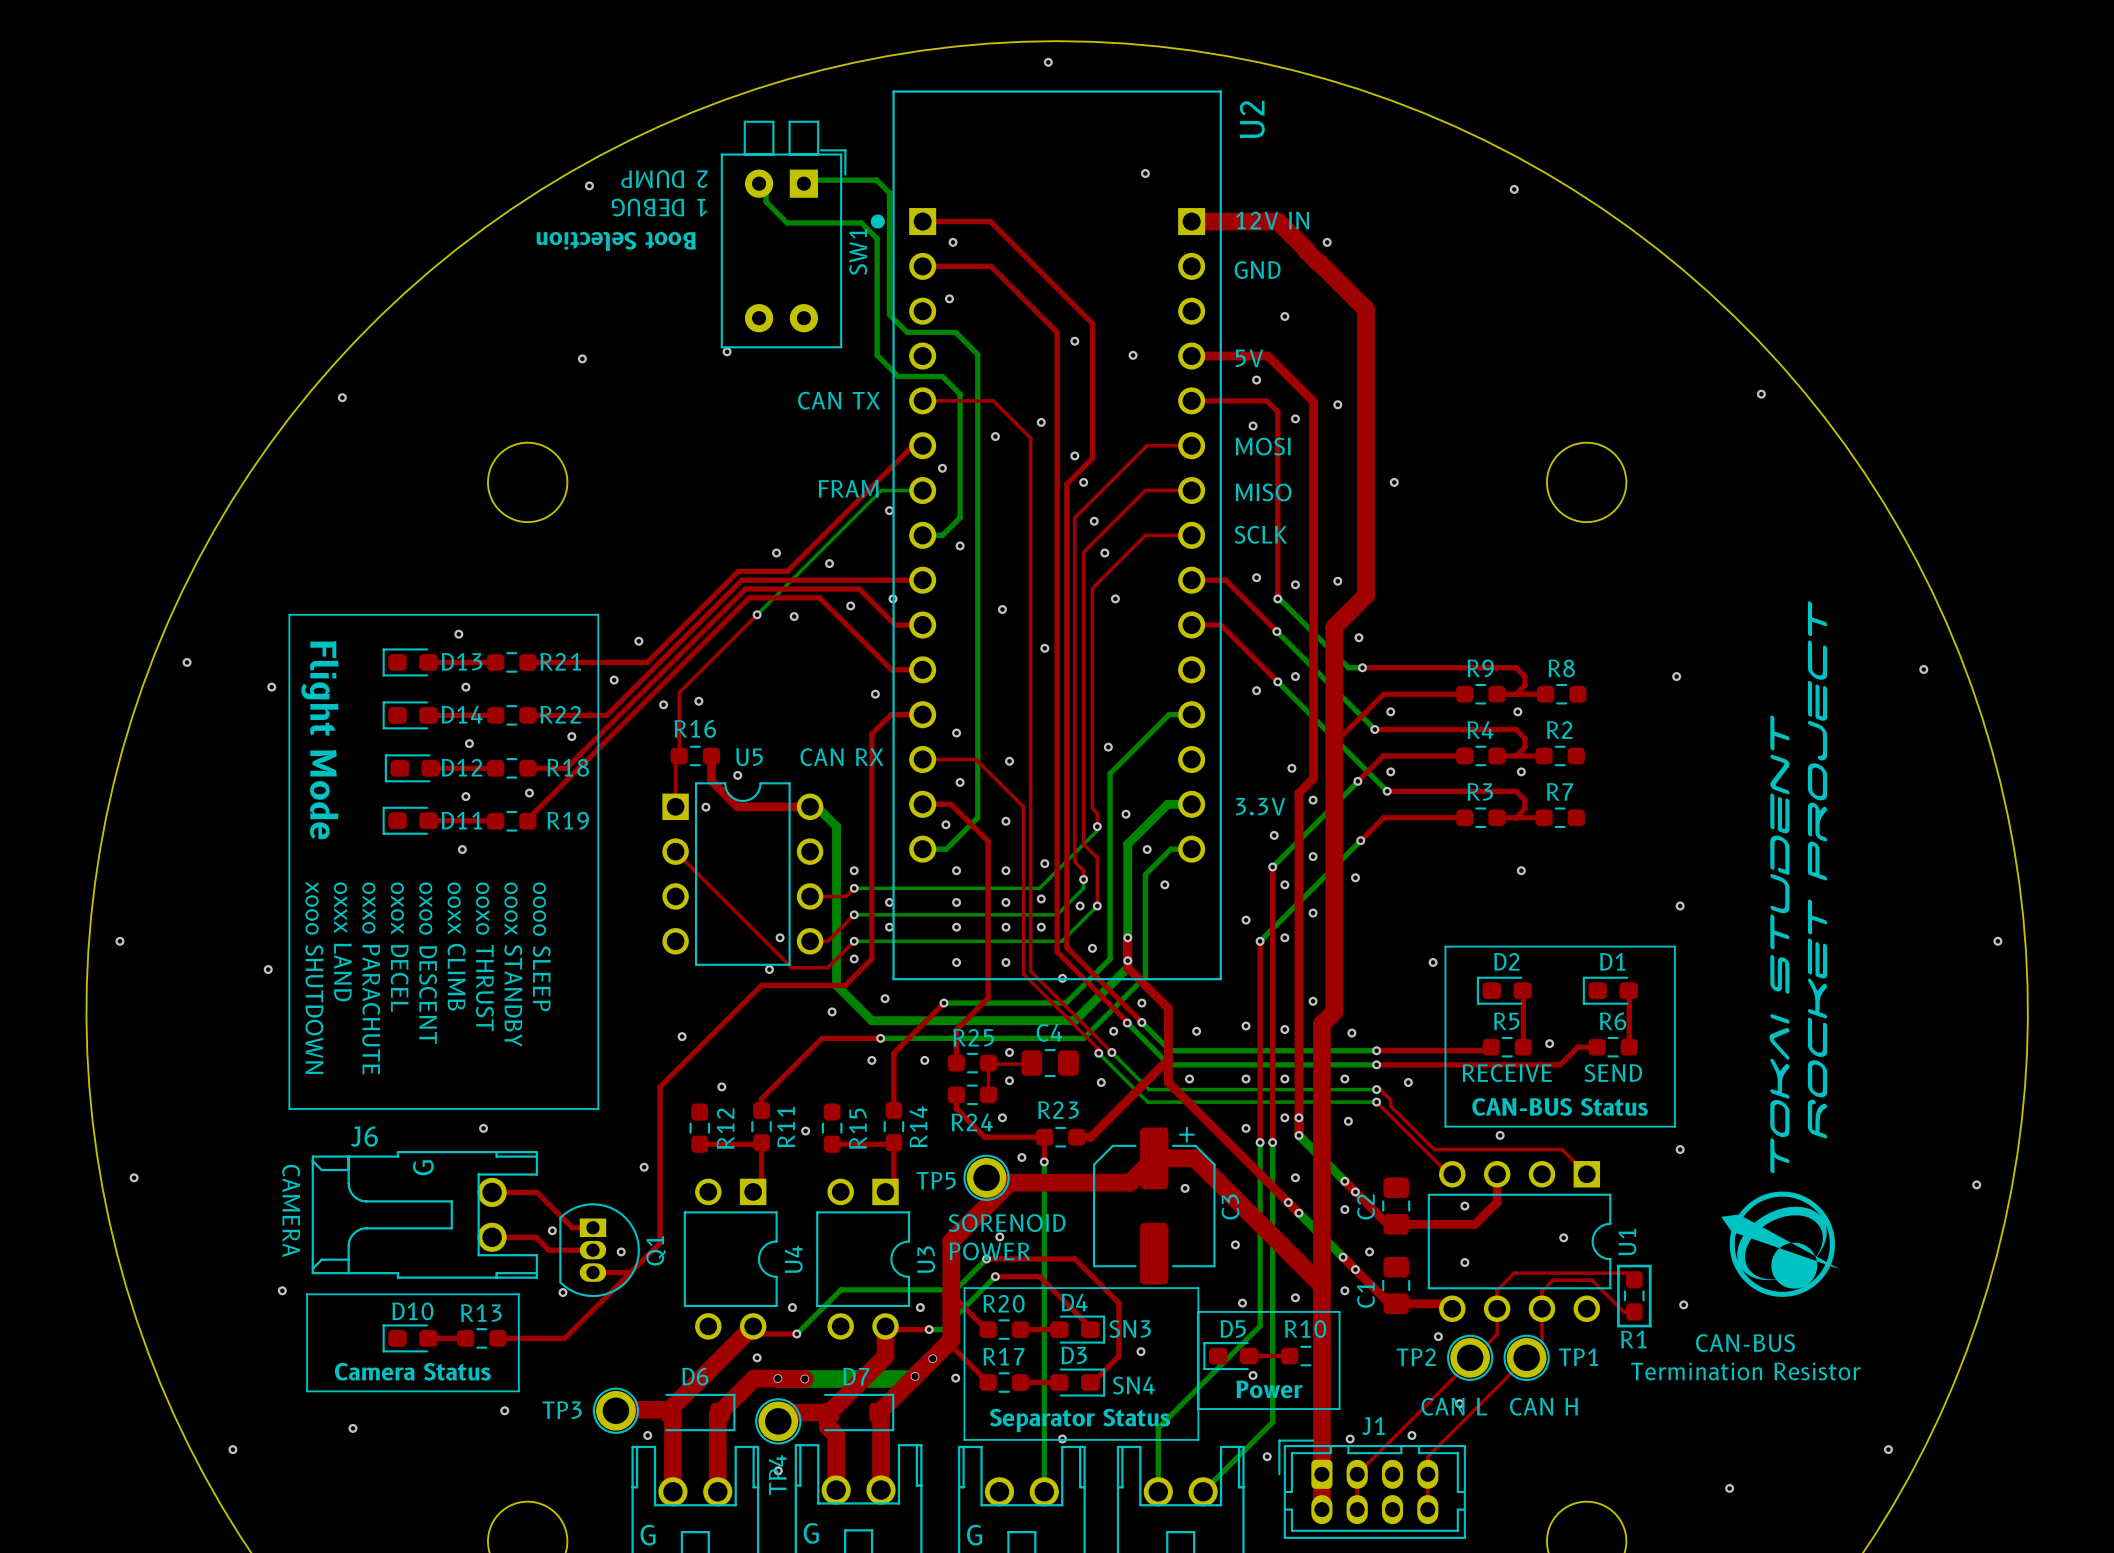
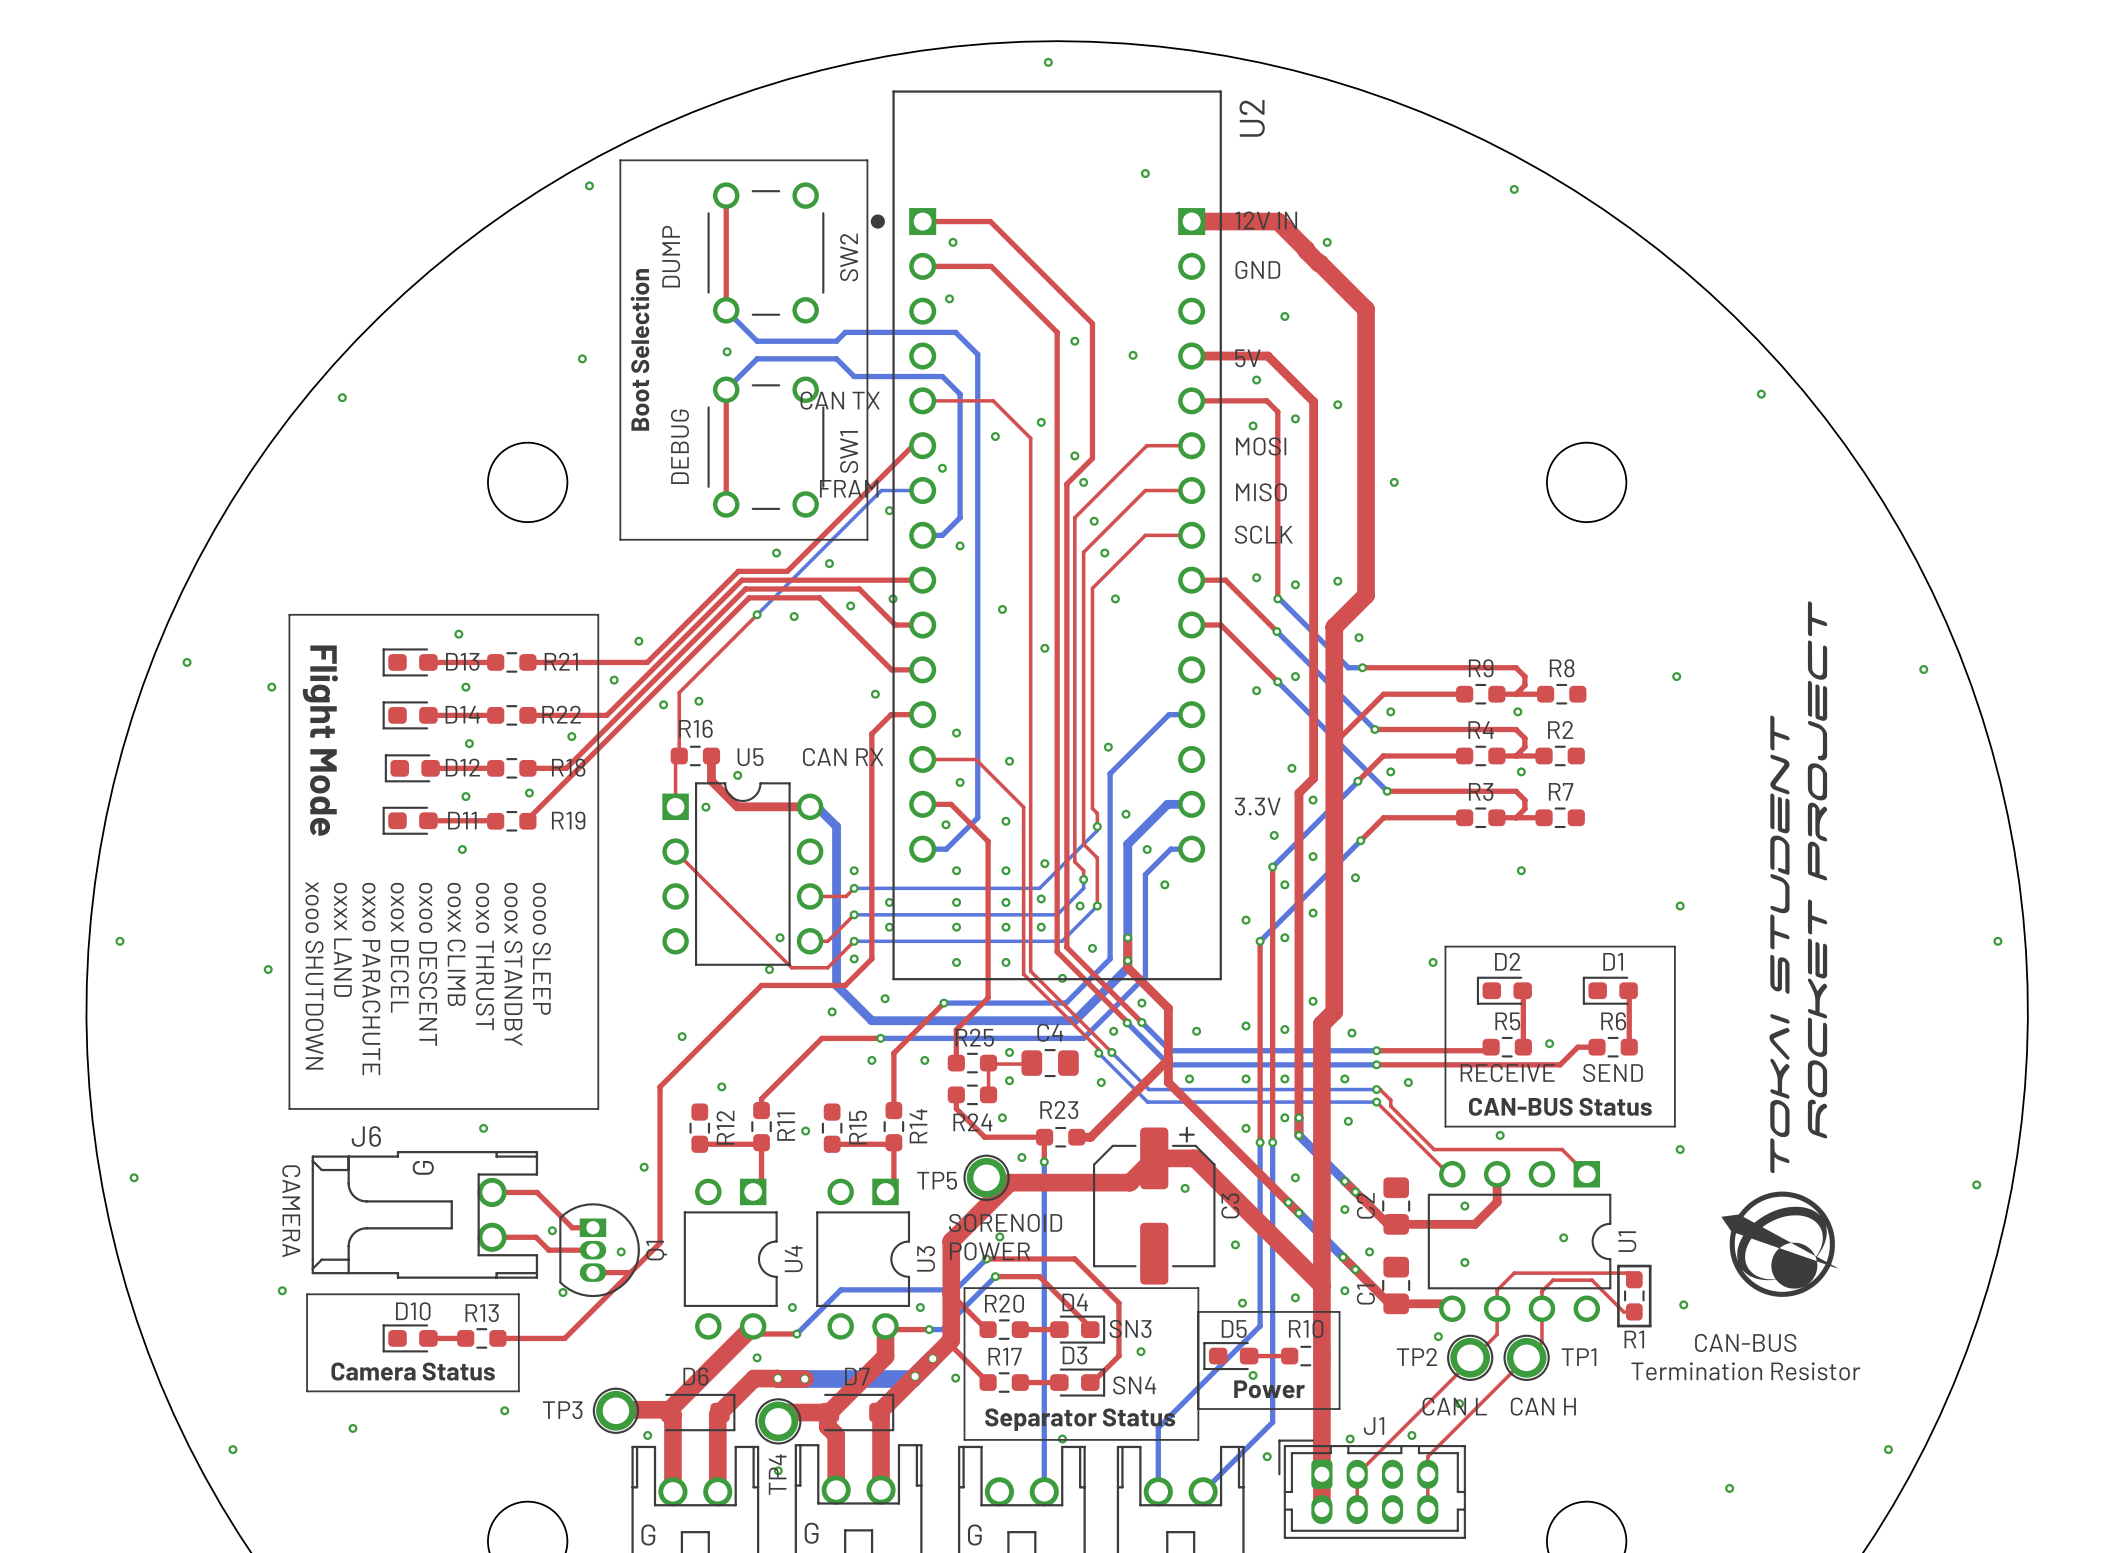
SW1 footprint: [720, 120, 847, 349] -> [707, 376, 825, 518]
line: none -> (620, 160) (867, 160) (867, 539) (620, 539) (620, 160)
text: 2 DUMP (664, 179) -> none
bottom track: (766, 180) (766, 201) (787, 222) (861, 222) (877, 238) (877, 355) (898, 376) -> (726, 389) (757, 358) (836, 358) (854, 376) (898, 376)
bottom track: (810, 180) (876, 180) (889, 192) (889, 314) (907, 332) -> (726, 310) (757, 341) (836, 341) (845, 332) (907, 332)
top track: none -> (726, 195) (726, 310)
text: 1 DEBUG (659, 207) -> none
text rotation: 0° (616, 241) -> 90° clockwise (639, 349)
SW2: none -> (765, 252)
text: none -> DUMP (671, 256)
top track: none -> (726, 380) (726, 495)
text: none -> DEBUG (679, 446)

